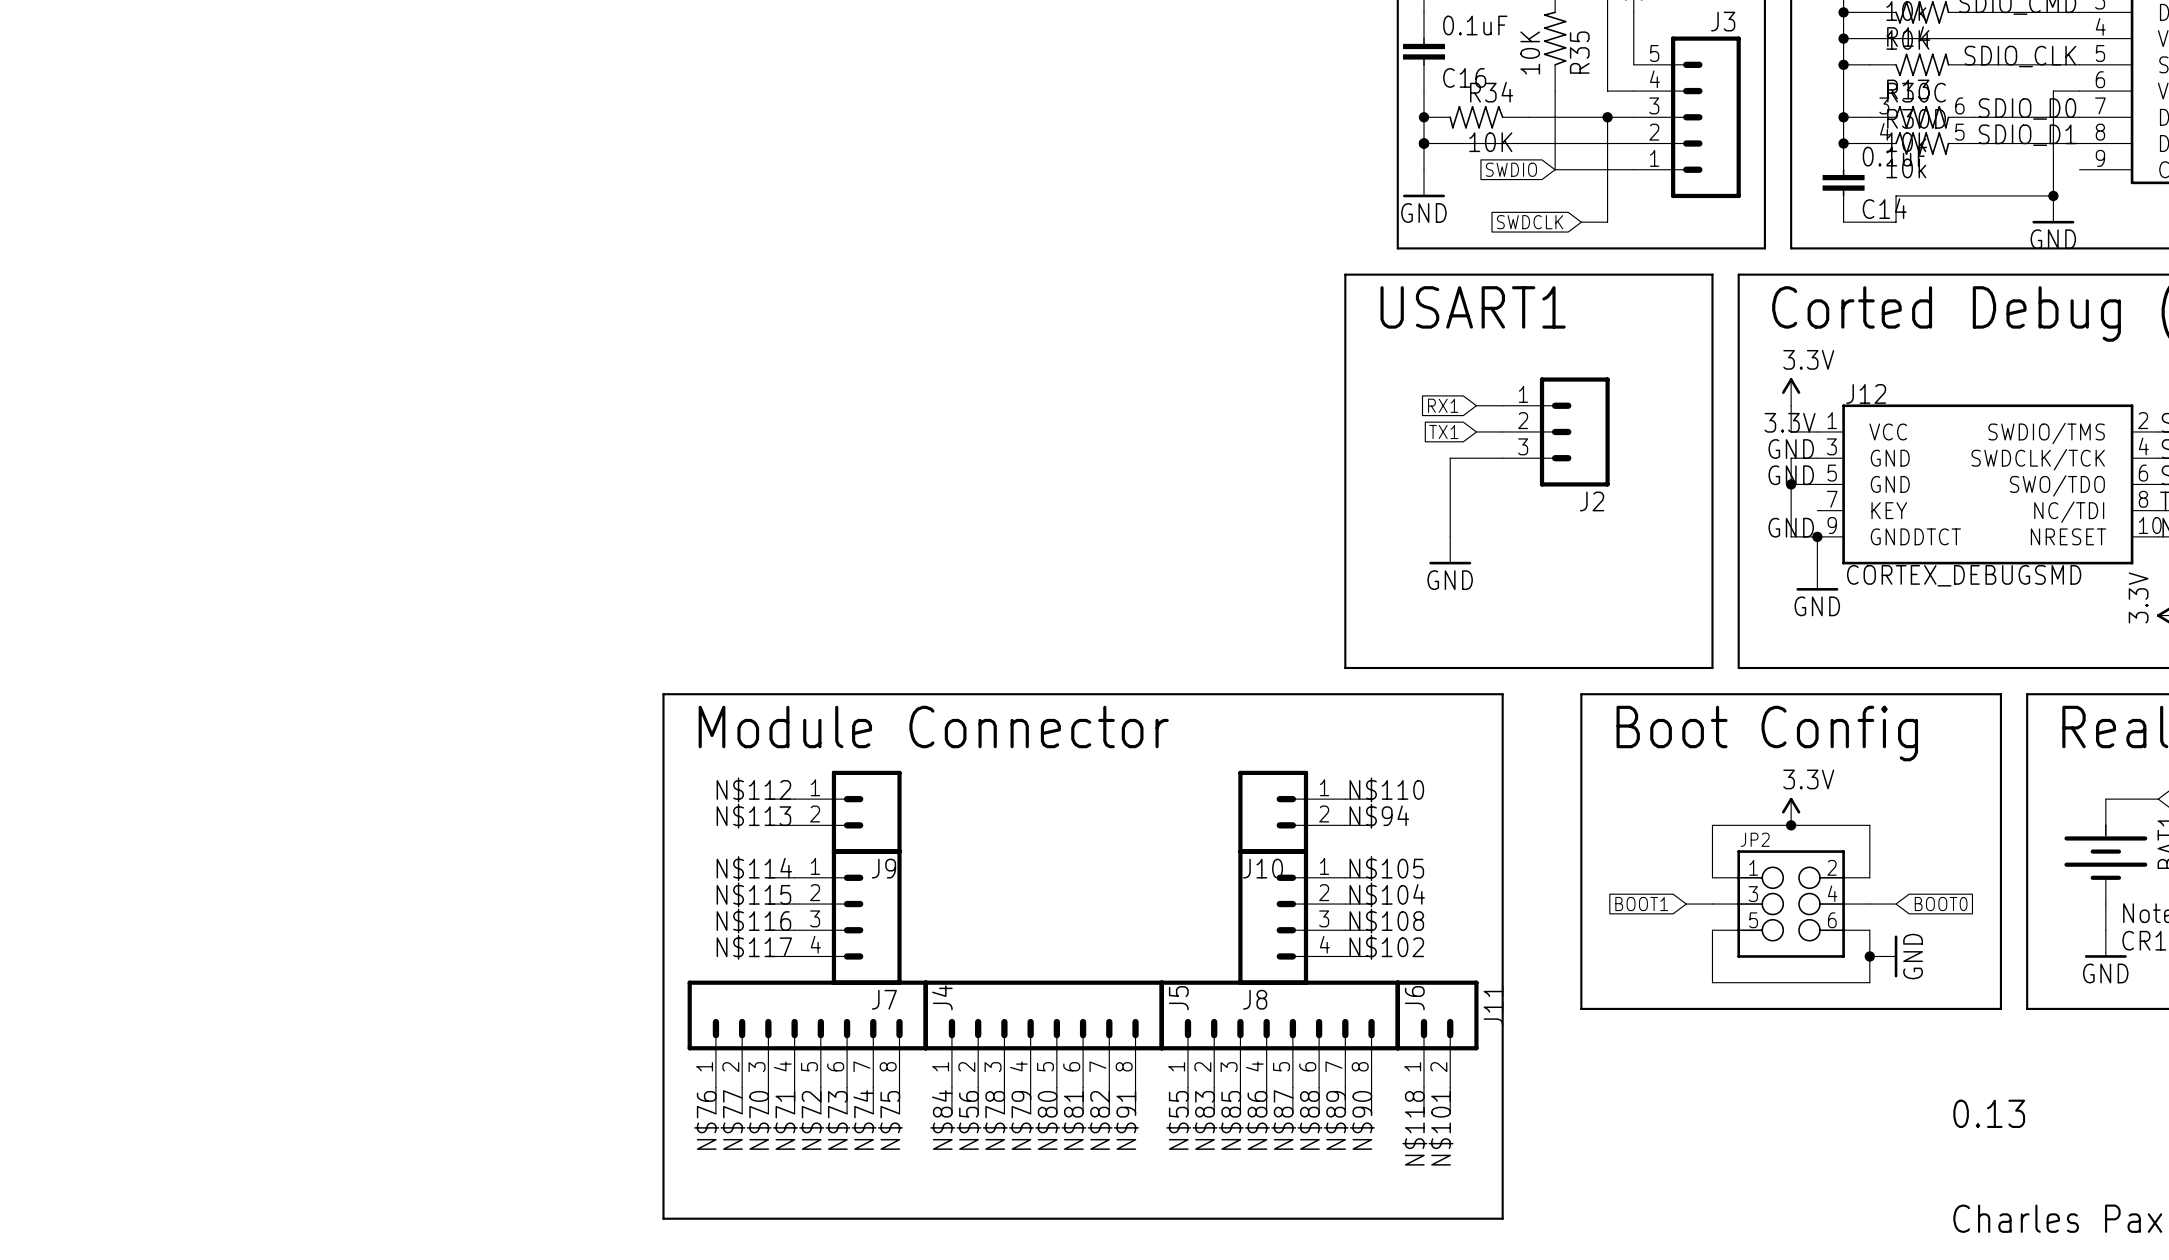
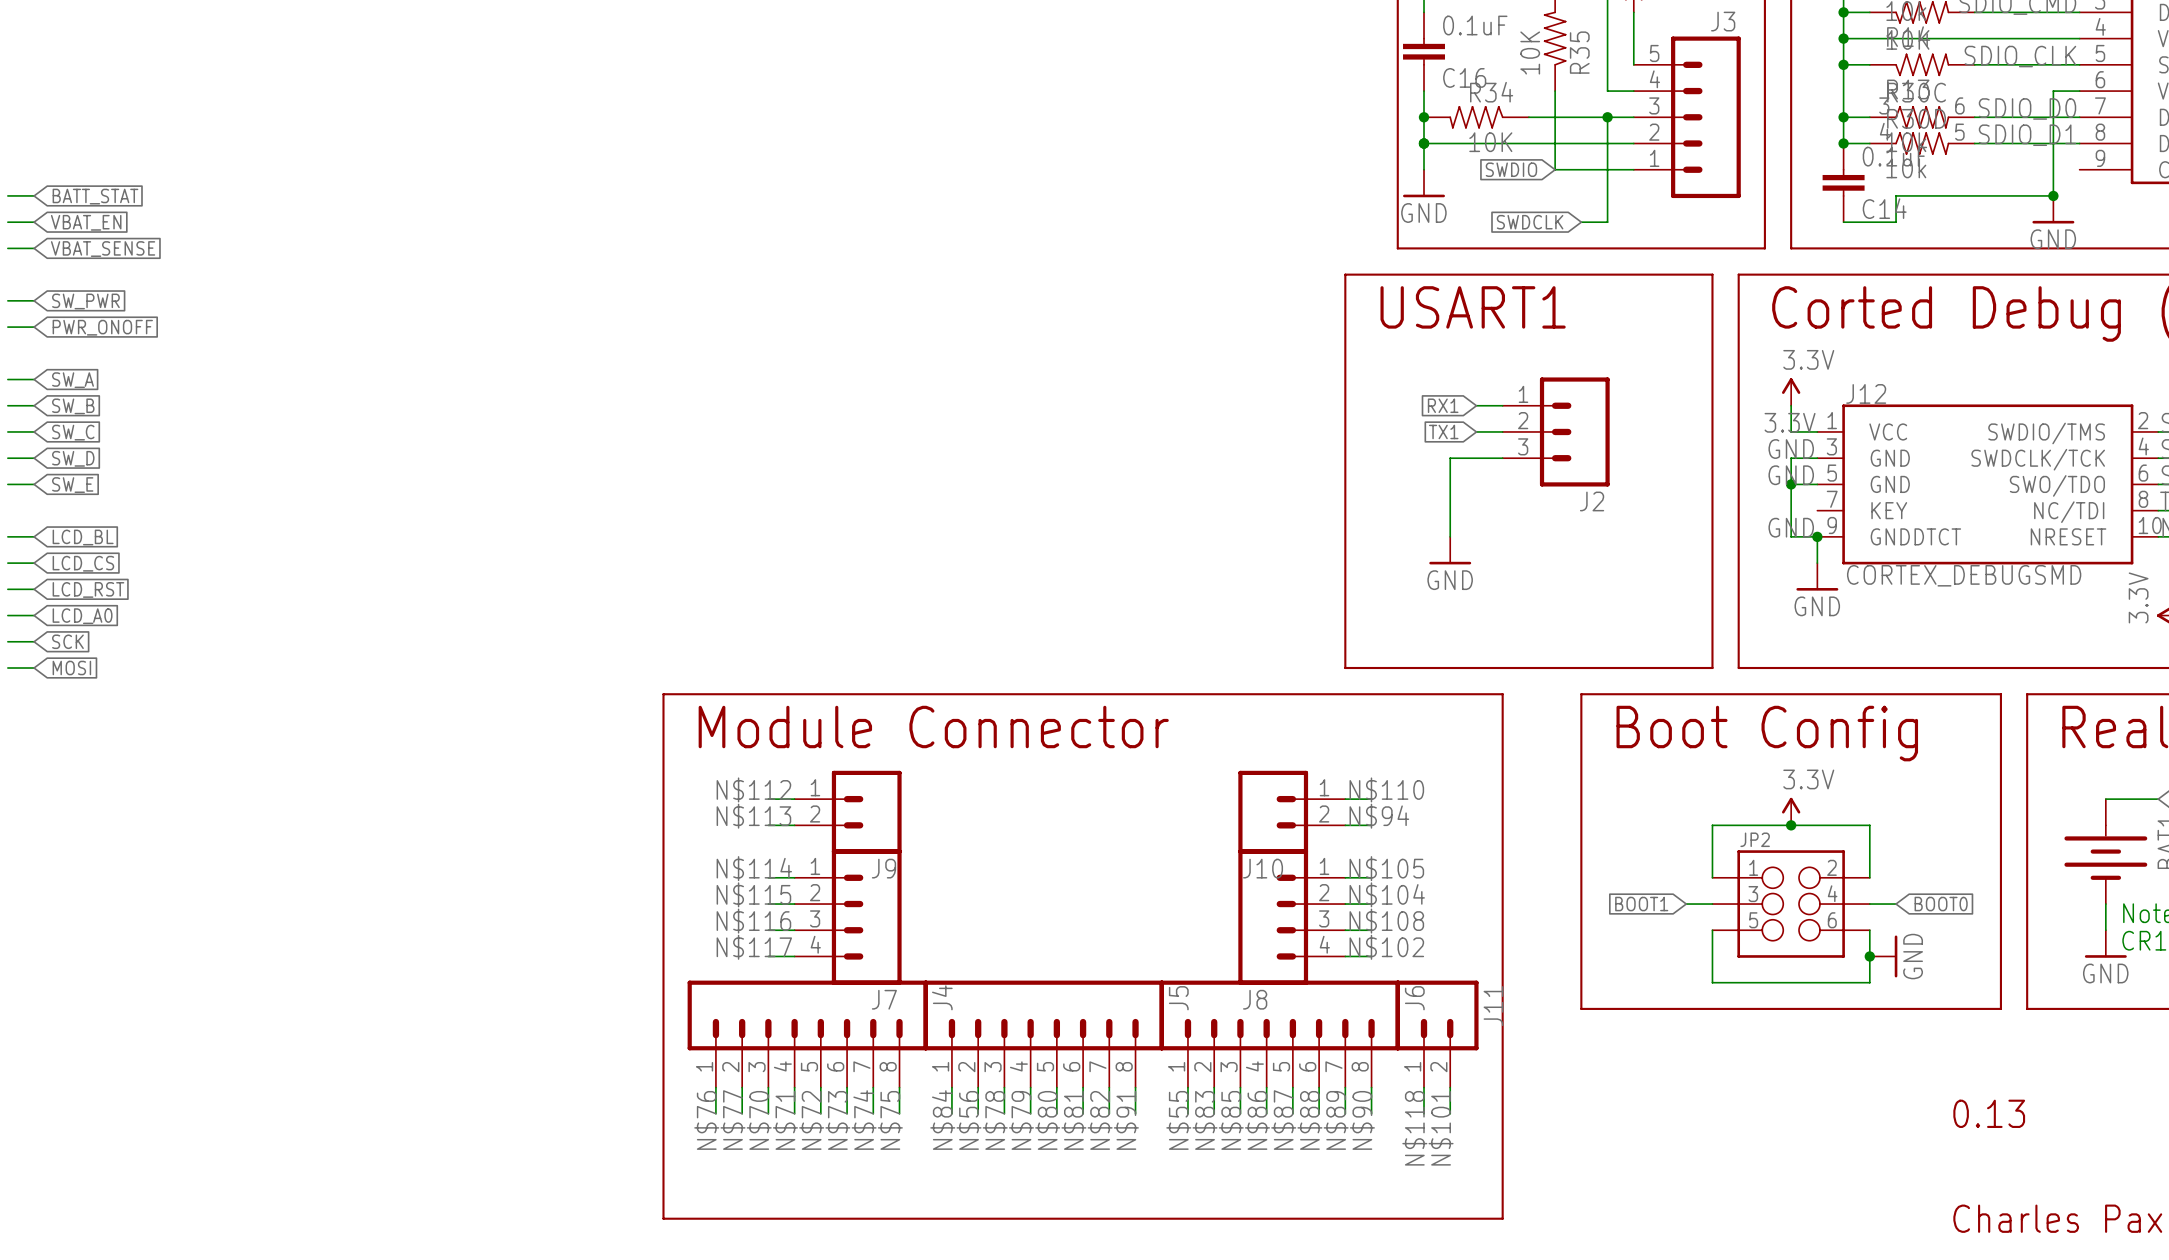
wire: none -> (7, 195) (34, 195)
global label: none -> BATT_STAT (95, 196)
wire: none -> (7, 222) (34, 222)
global label: none -> VBAT_EN (86, 222)
wire: none -> (7, 248) (34, 248)
global label: none -> VBAT_SENSE (103, 249)
wire: none -> (7, 300) (34, 300)
global label: none -> SW_PWR (85, 301)
wire: none -> (7, 327) (34, 327)
global label: none -> PWR_ONOFF (102, 327)
wire: none -> (7, 379) (34, 379)
global label: none -> SW_A (73, 380)
wire: none -> (7, 405) (34, 405)
global label: none -> SW_B (73, 406)
wire: none -> (7, 431) (34, 431)
global label: none -> SW_C (73, 432)
wire: none -> (7, 458) (34, 458)
global label: none -> SW_D (73, 458)
wire: none -> (7, 484) (34, 484)
global label: none -> SW_E (72, 485)
wire: none -> (7, 536) (34, 536)
global label: none -> LCD_BL (83, 537)
wire: none -> (7, 563) (34, 563)
global label: none -> LCD_CS (83, 563)
wire: none -> (7, 589) (34, 589)
global label: none -> LCD_RST (88, 589)
wire: none -> (7, 615) (34, 615)
global label: none -> LCD_A0 (82, 616)
wire: none -> (7, 641) (34, 641)
global label: none -> SCK (67, 641)
wire: none -> (7, 668) (34, 668)
global label: none -> MOSI (71, 668)

